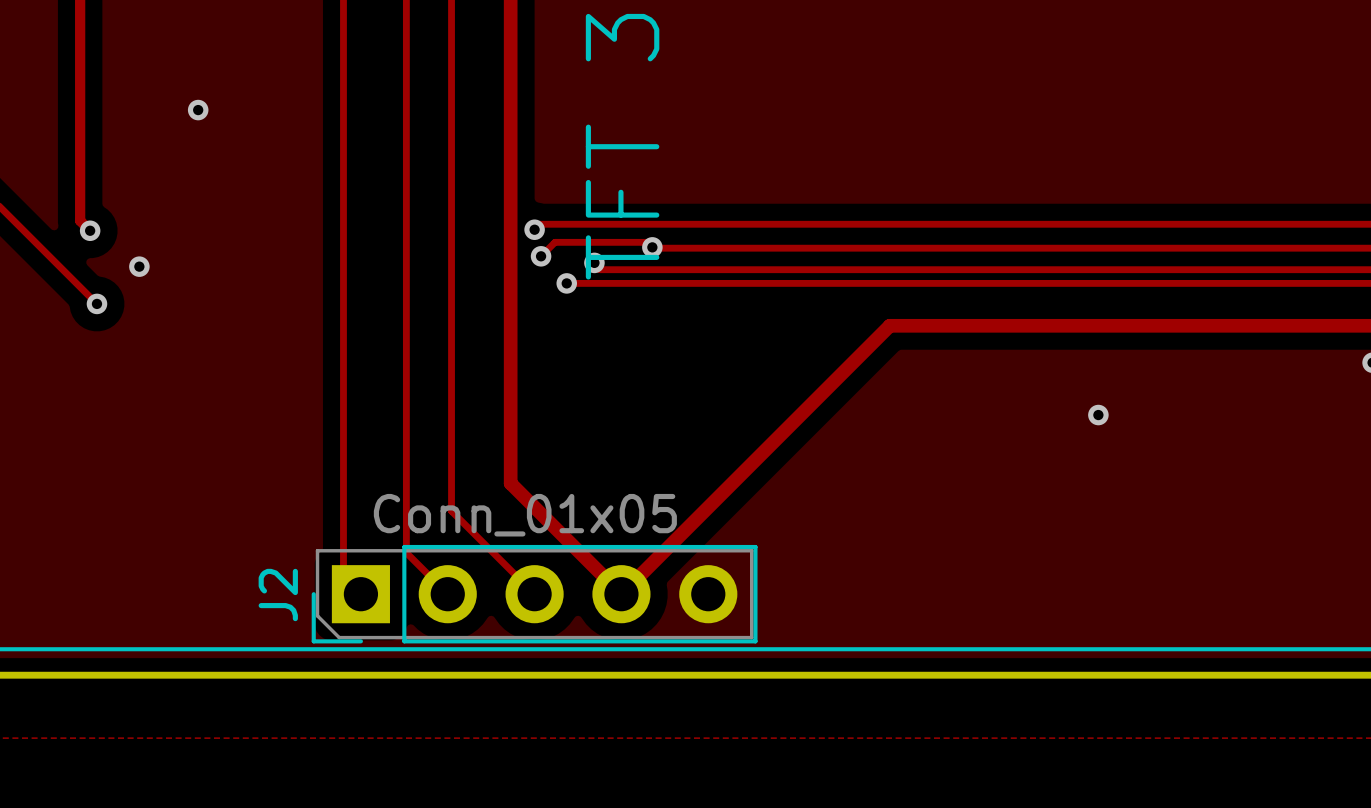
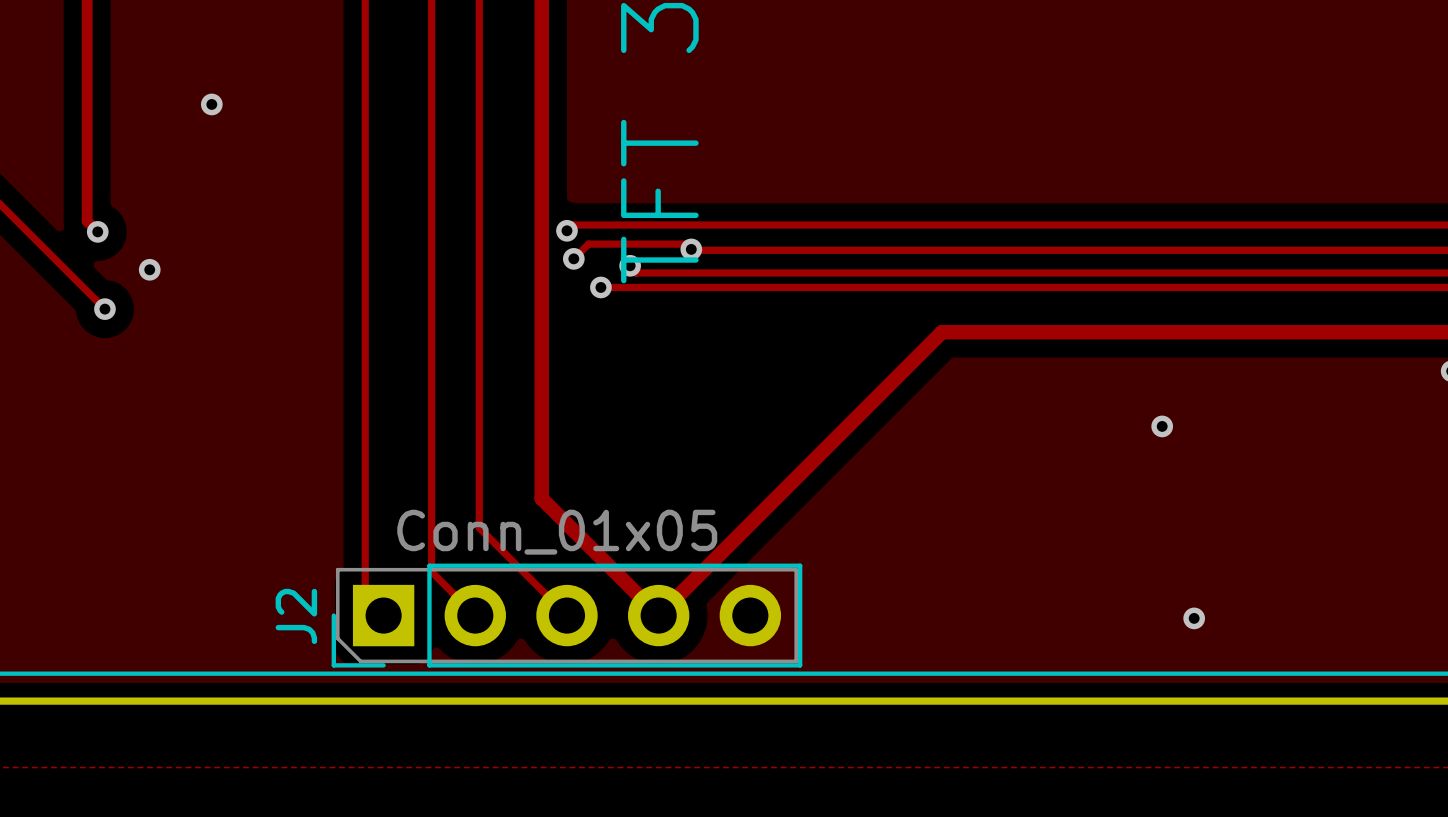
via: none -> (1194, 618)

